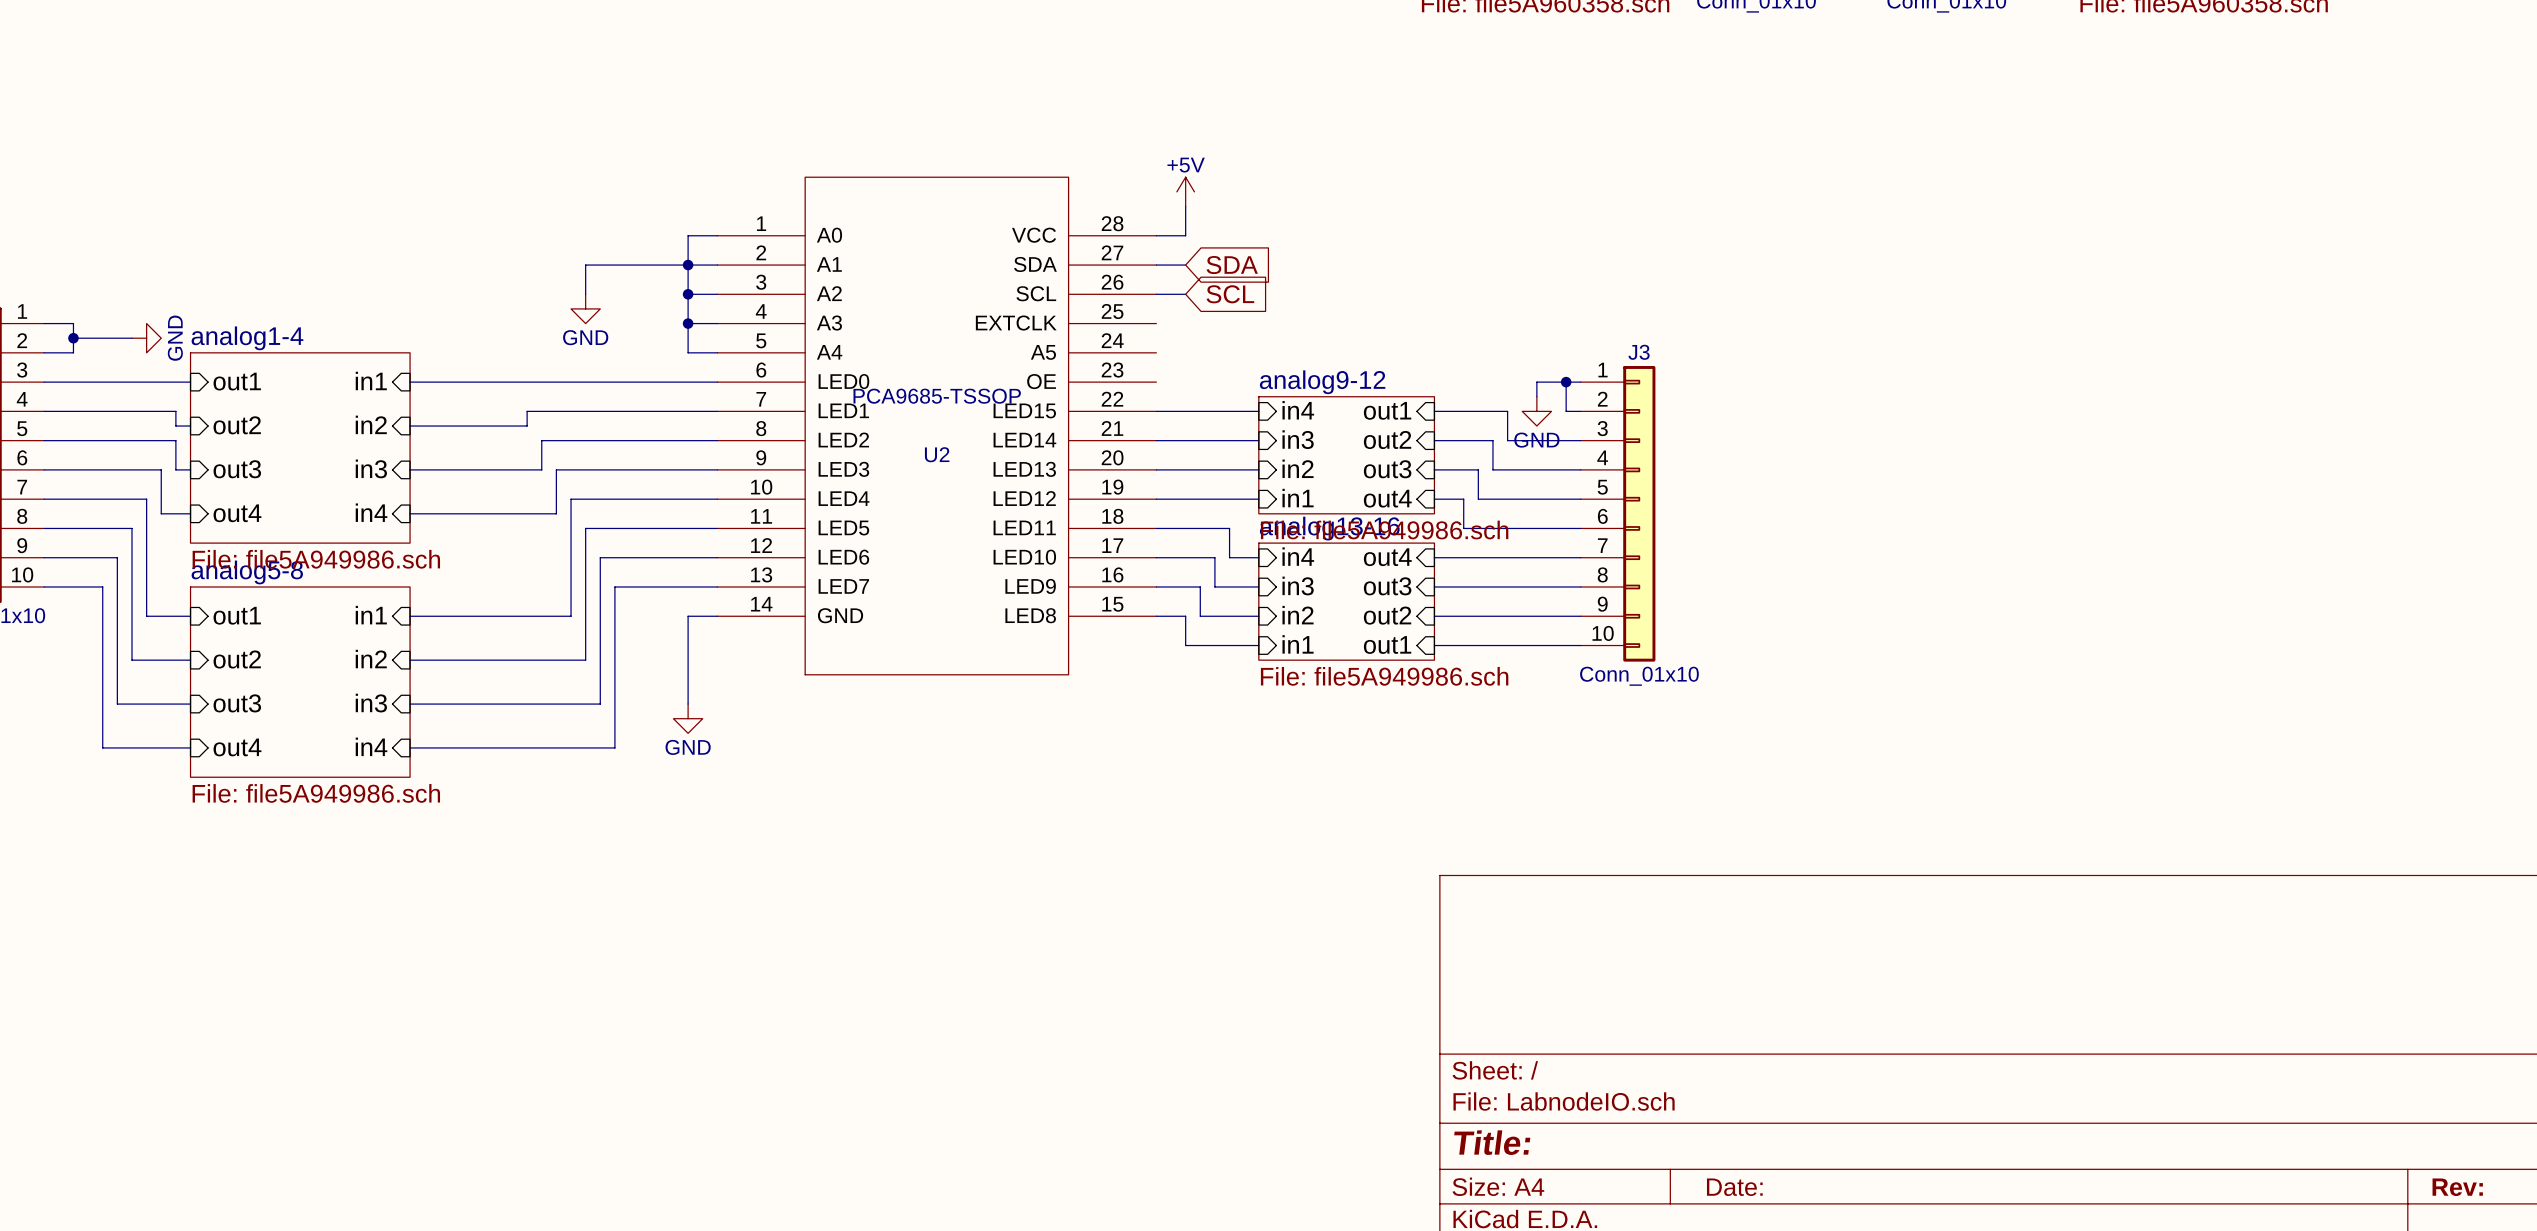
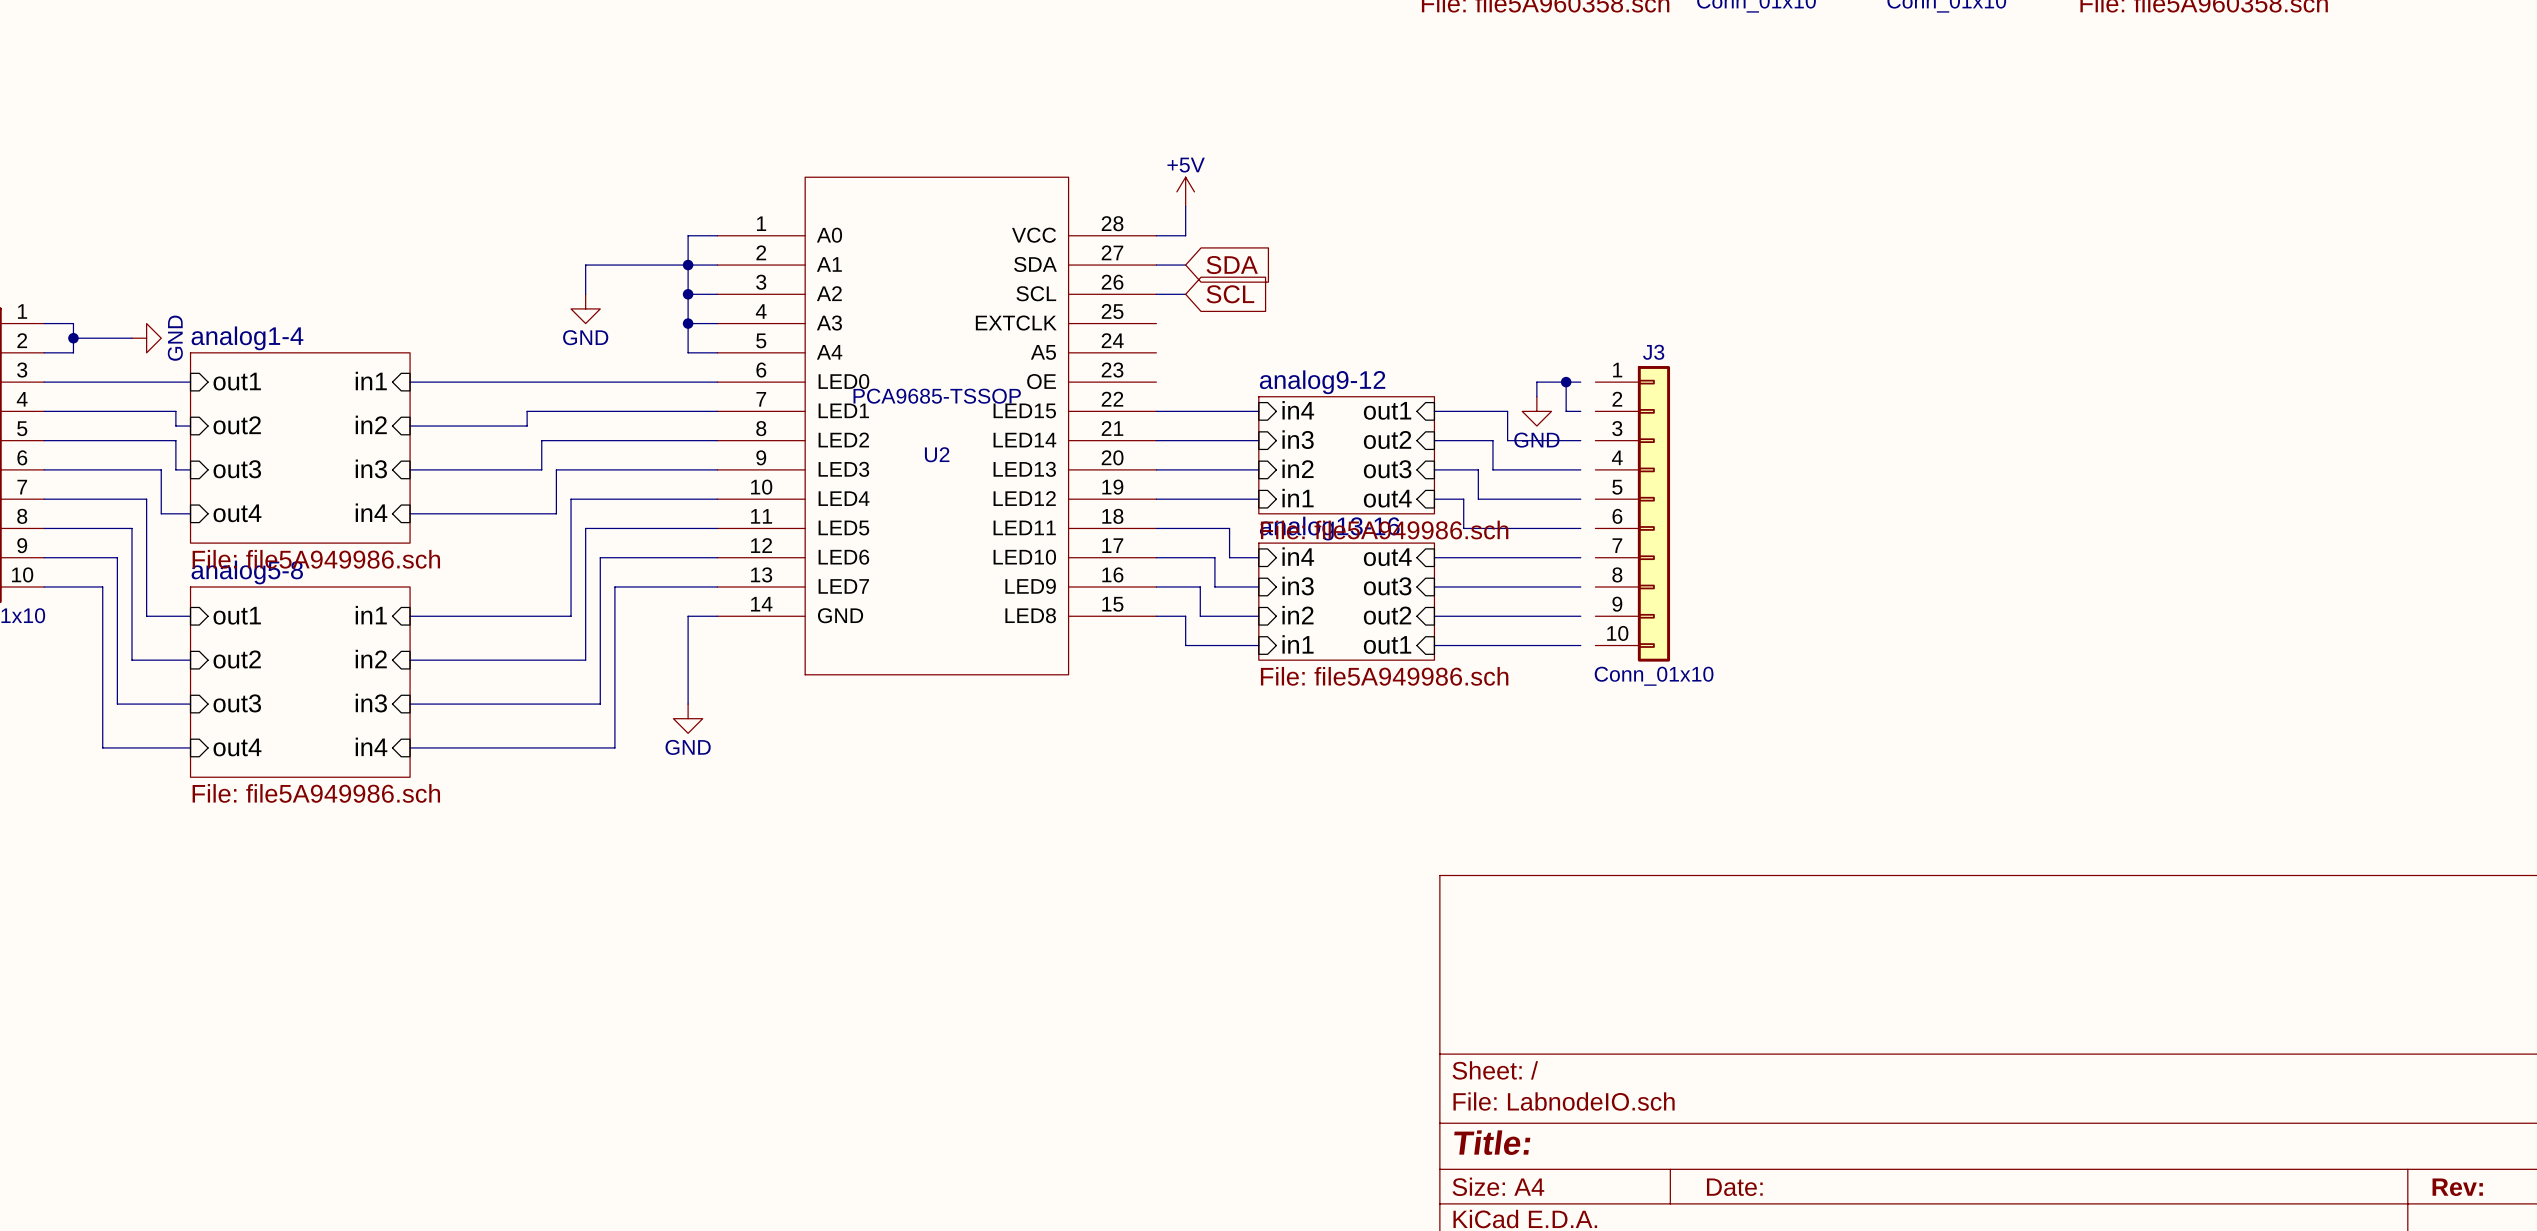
J3 position: (1618, 513) -> (1632, 513)

